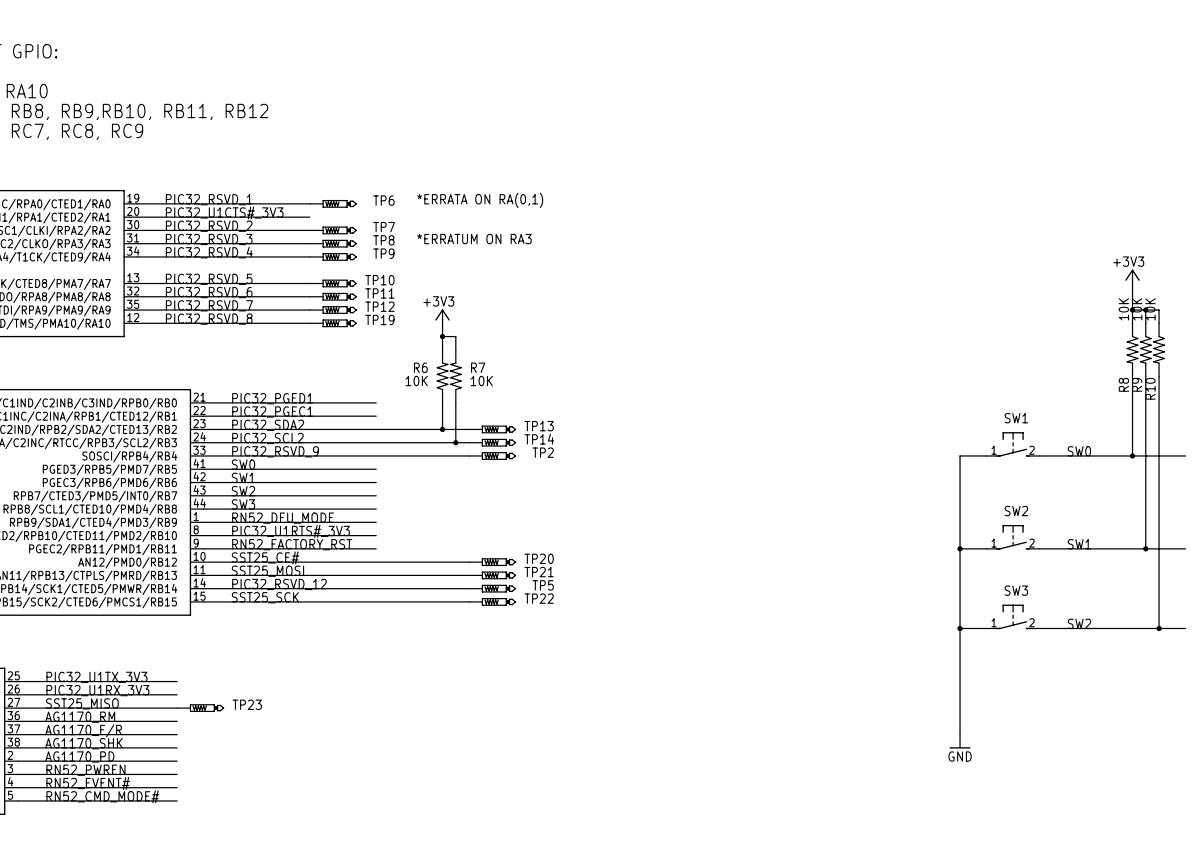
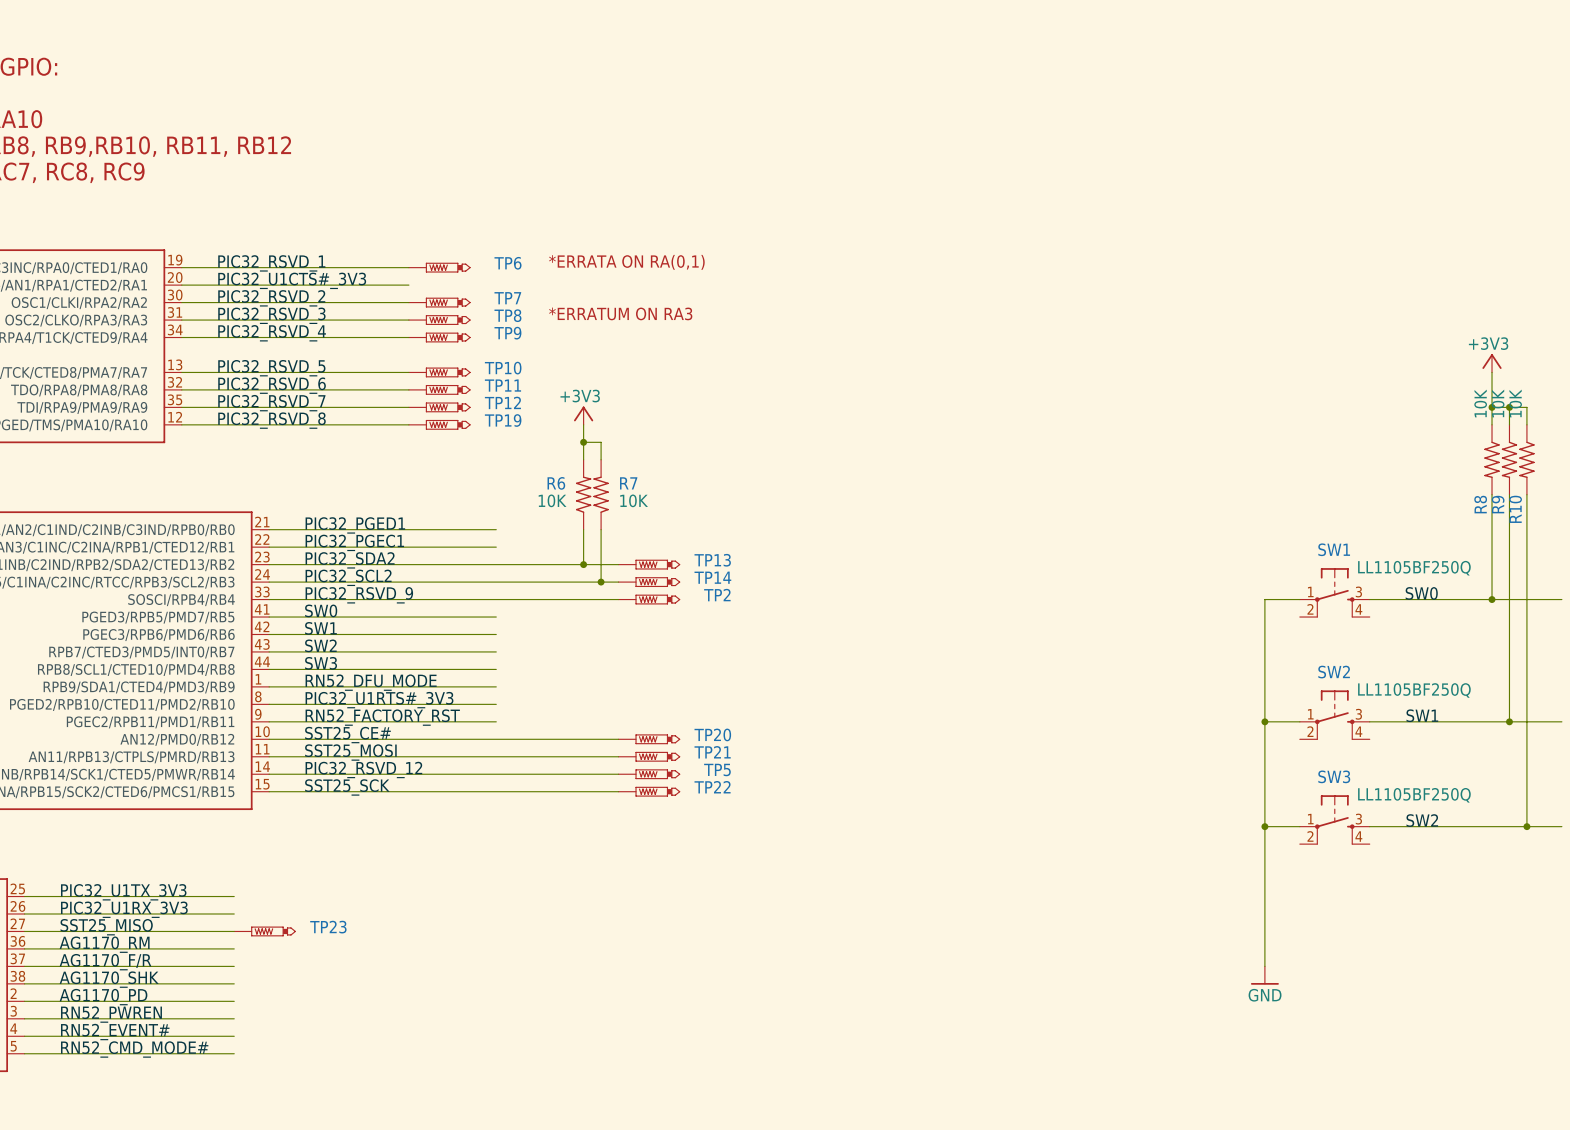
SW1 value: none -> LL1105BF250Q (1414, 568)
SW1 symbol: [986, 432, 1040, 457] -> [1299, 568, 1370, 618]
SW2 symbol: [986, 524, 1040, 550] -> [1299, 690, 1370, 740]
SW2 value: none -> LL1105BF250Q (1414, 690)
SW3 symbol: [986, 604, 1040, 630] -> [1299, 795, 1370, 845]
SW3 value: none -> LL1105BF250Q (1414, 795)

